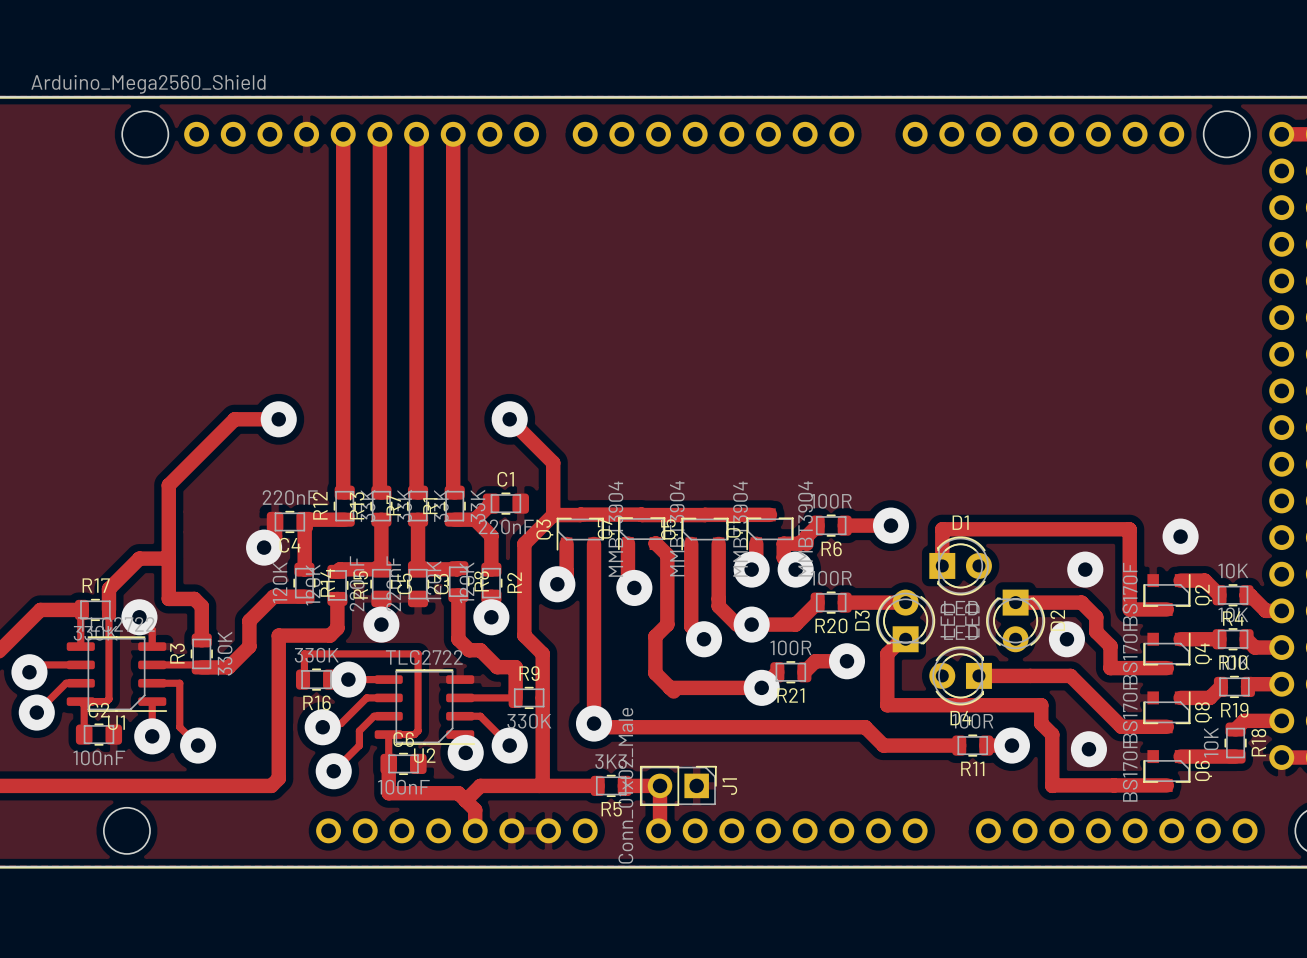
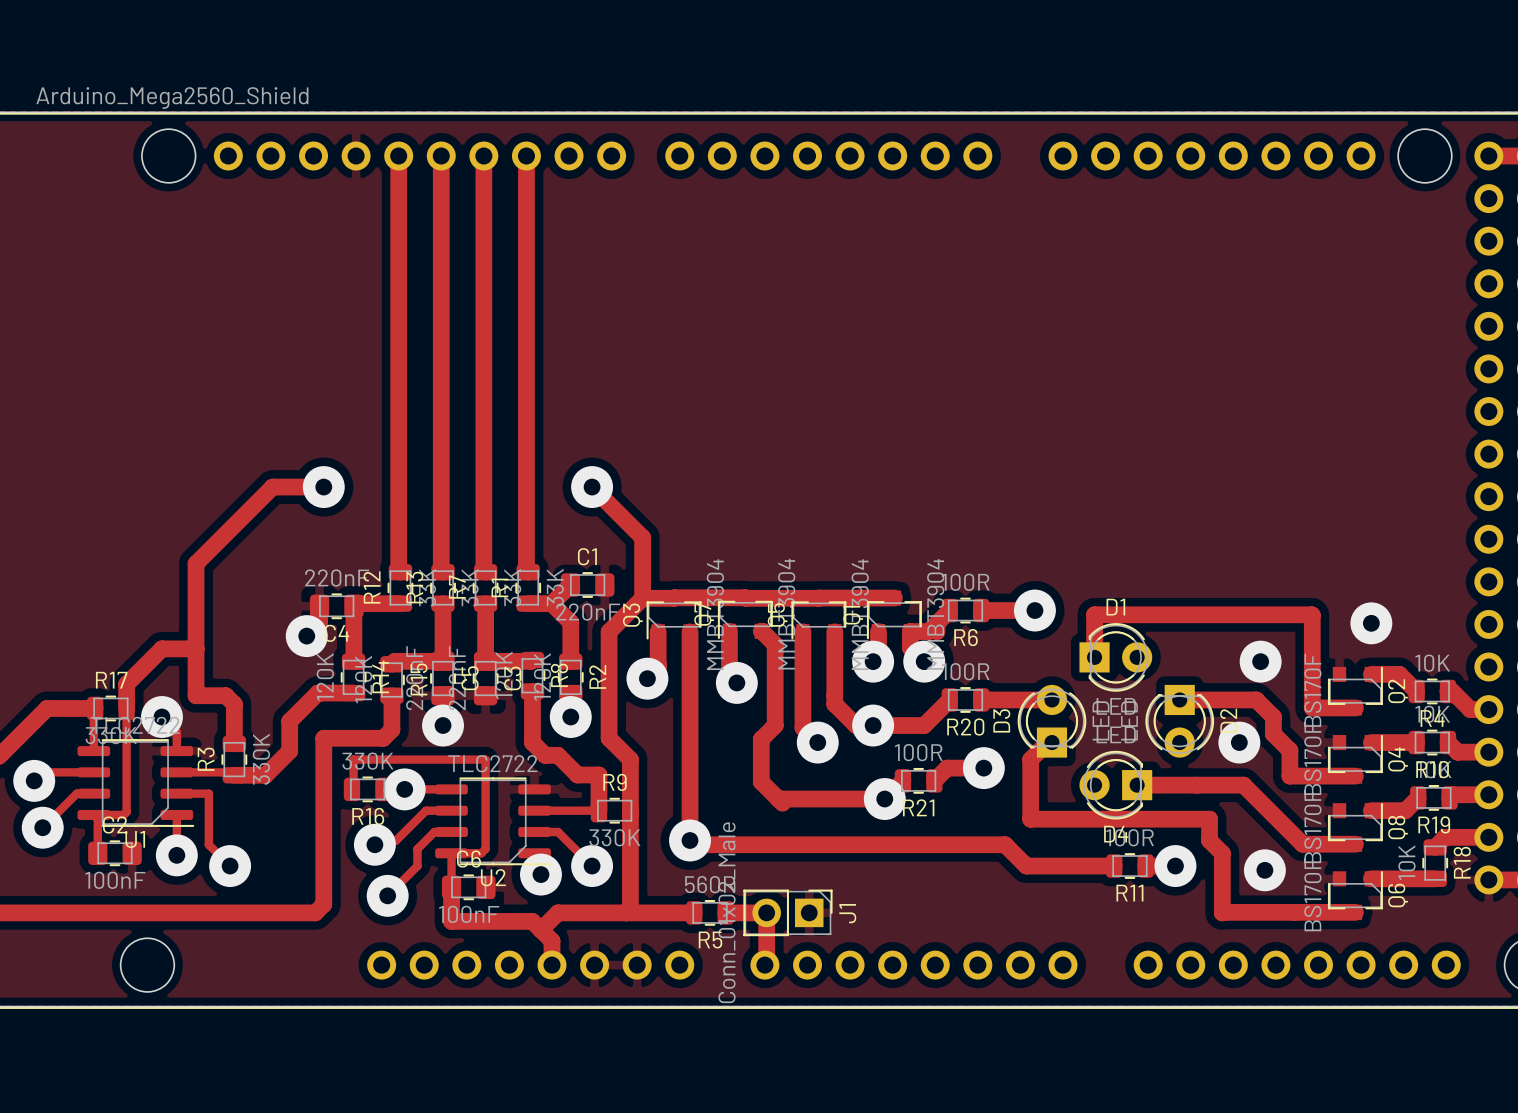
R5 value: 3K3 (611, 761) -> 560R (710, 884)

